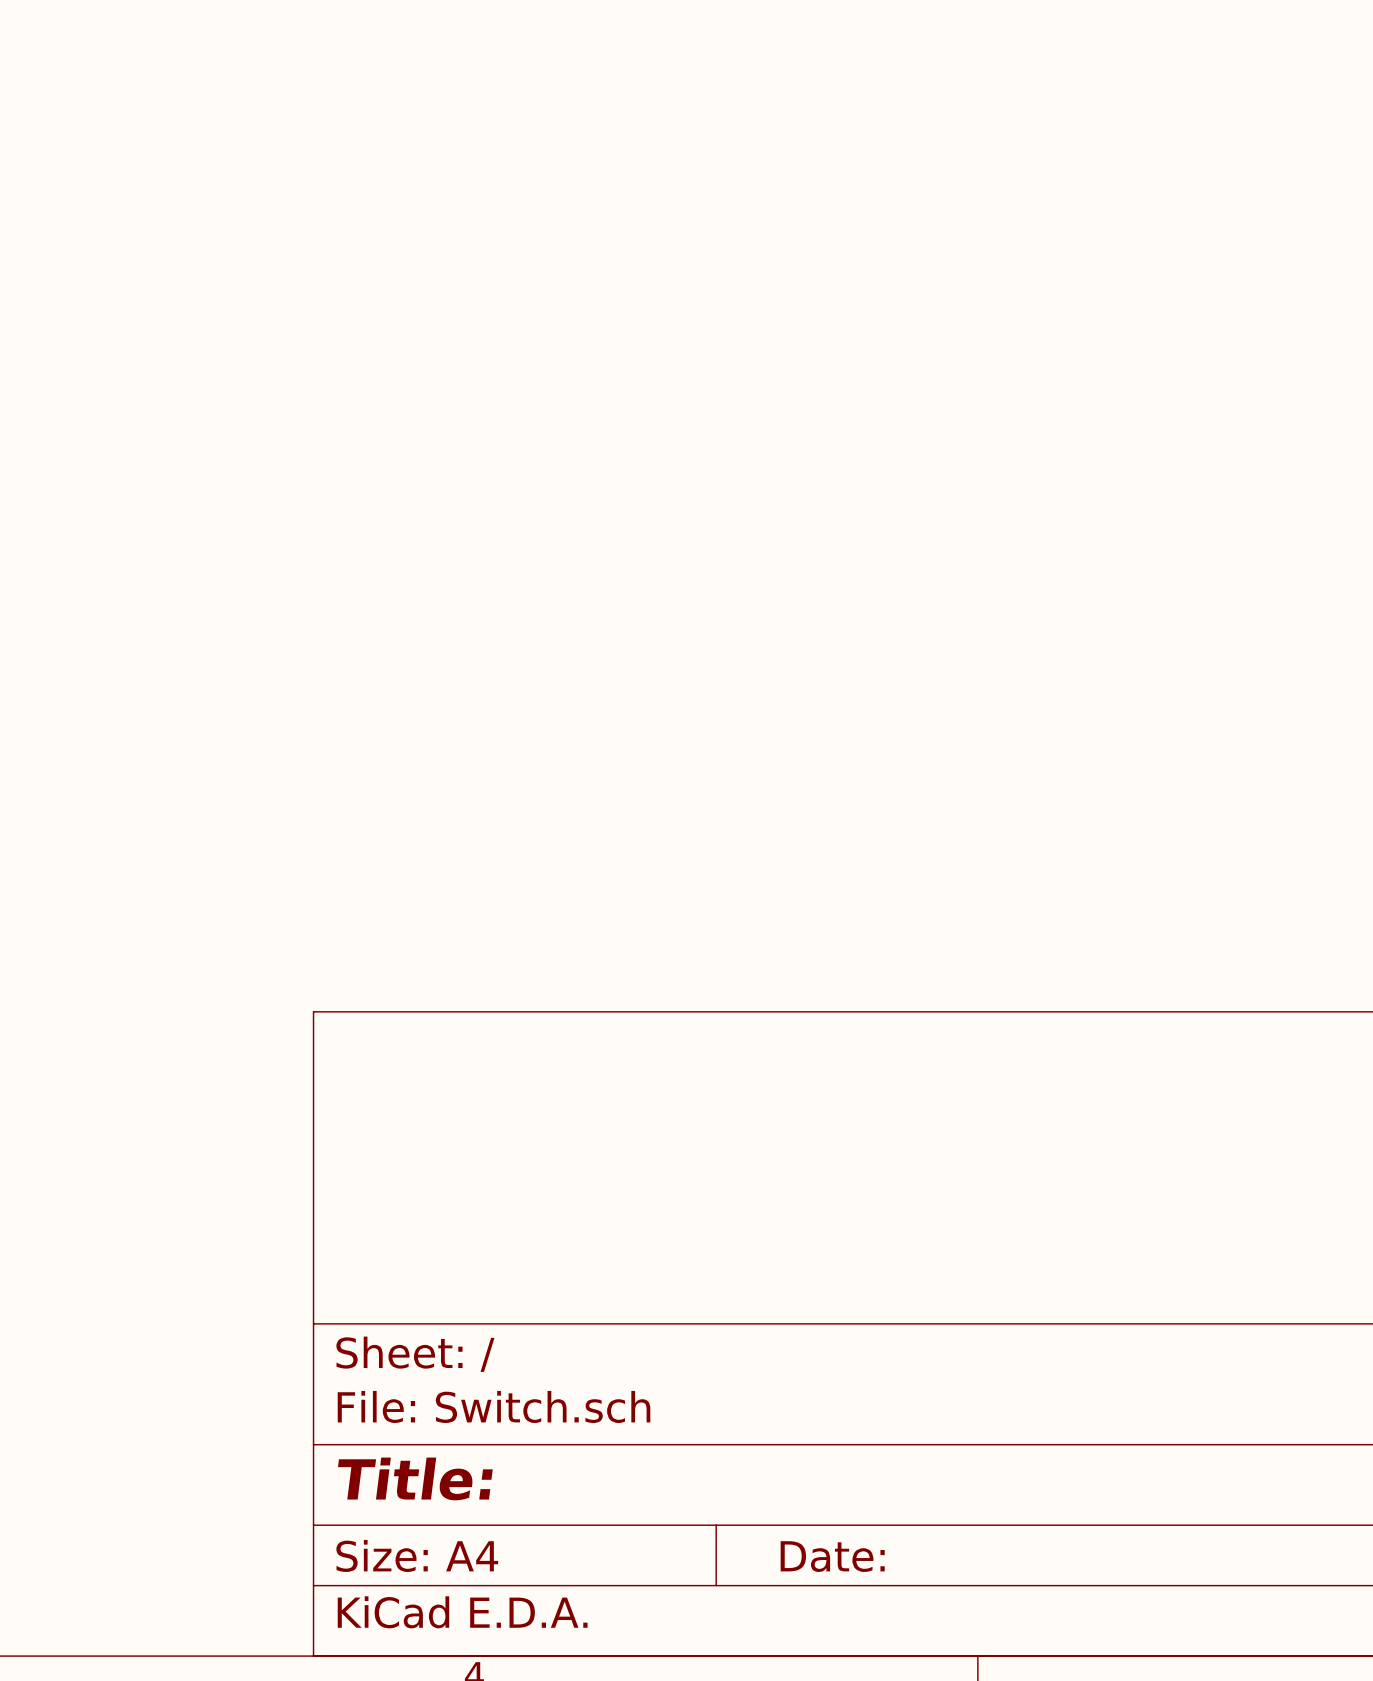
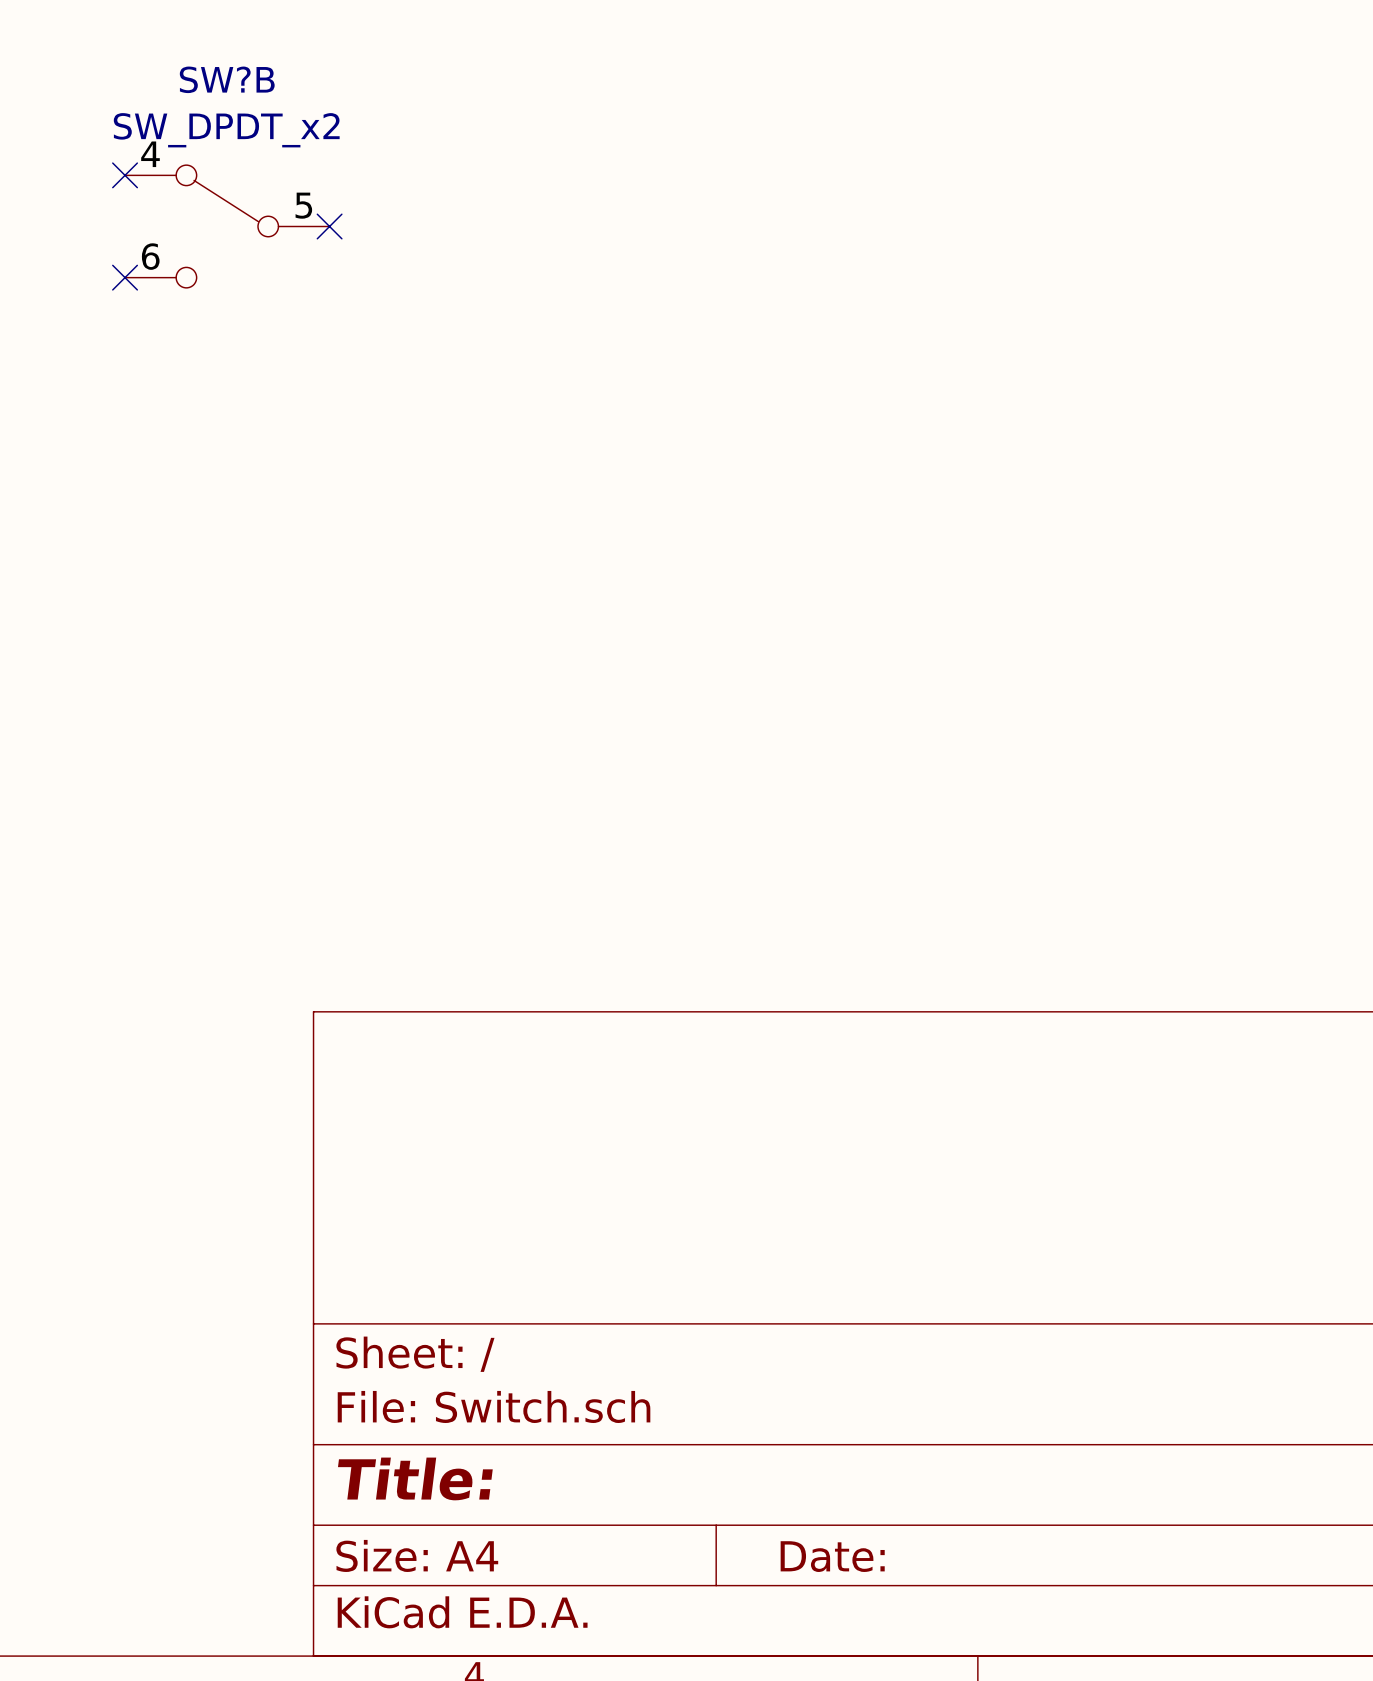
no-connect mark: none -> (125, 175)
SW?B: none -> SW_DPDT_x2 (227, 226)
no-connect mark: none -> (329, 226)
no-connect mark: none -> (125, 277)

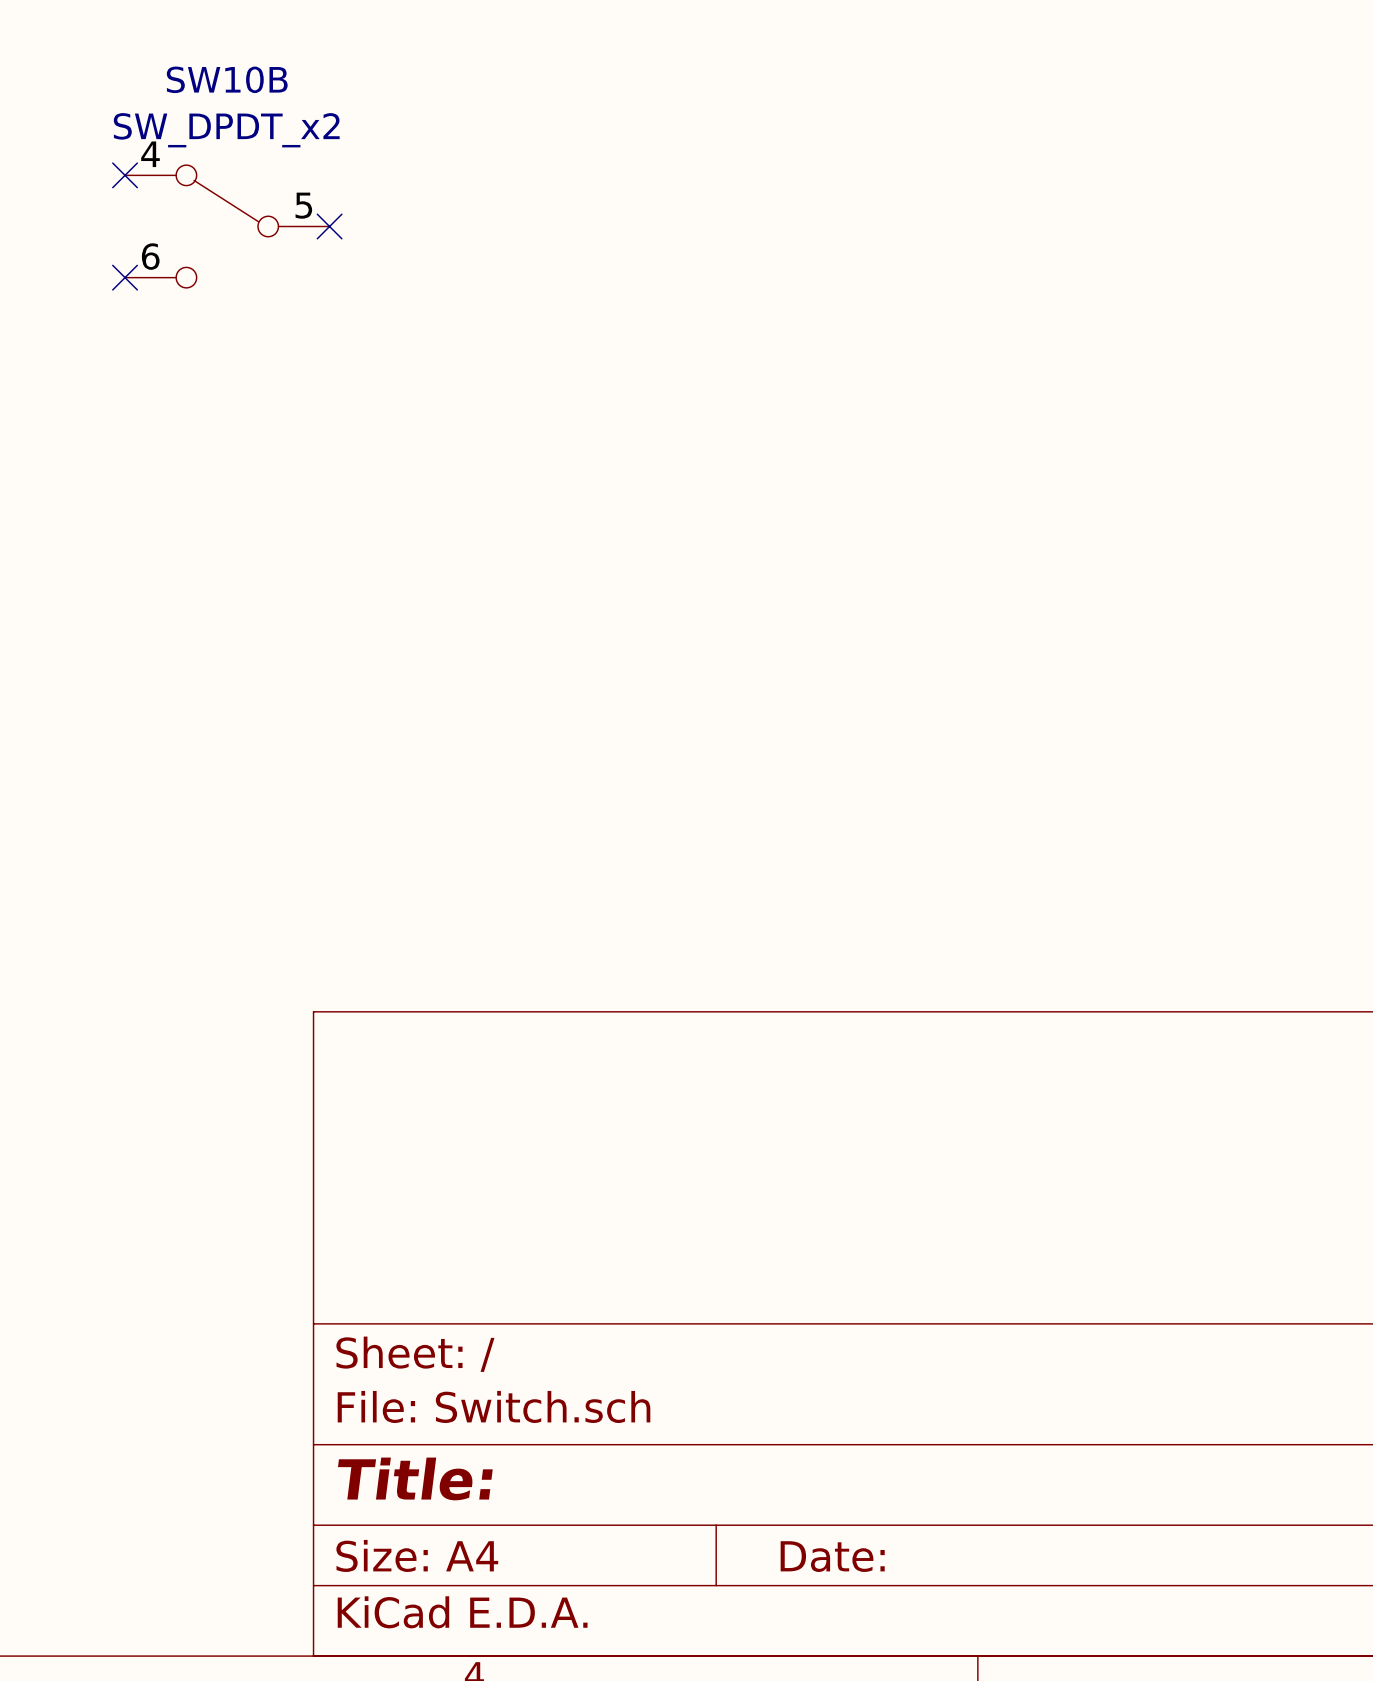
SW?B name: SW?B (227, 79) -> SW10B (227, 79)

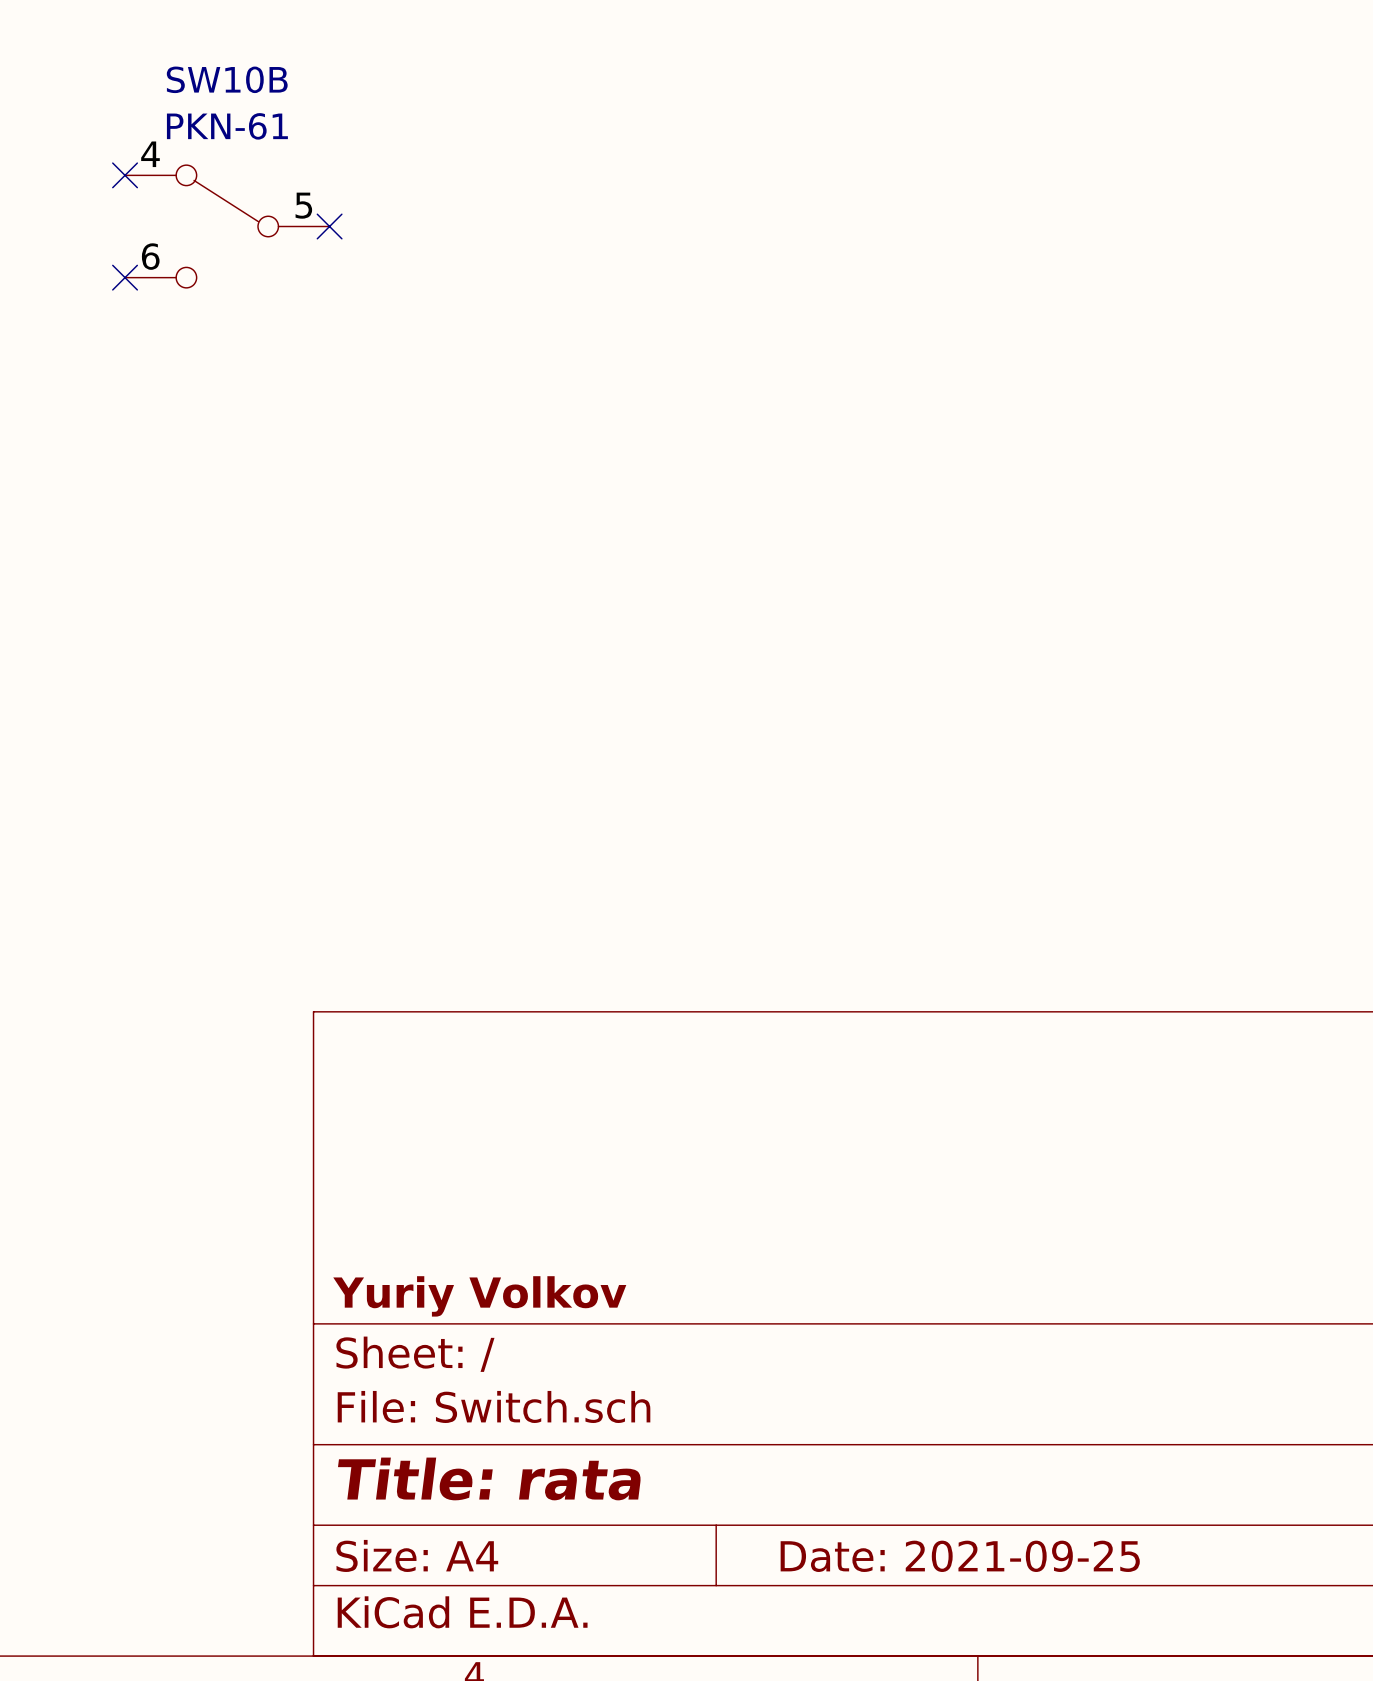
SW10B value: SW_DPDT_x2 (226, 130) -> PKN-61 (227, 126)
title block: none -> Yuriy Volkov (479, 1296)
title block: Title: (415, 1478) -> Title: rata (489, 1478)
title block: Date: (832, 1556) -> Date: 2021-09-25 (960, 1556)

